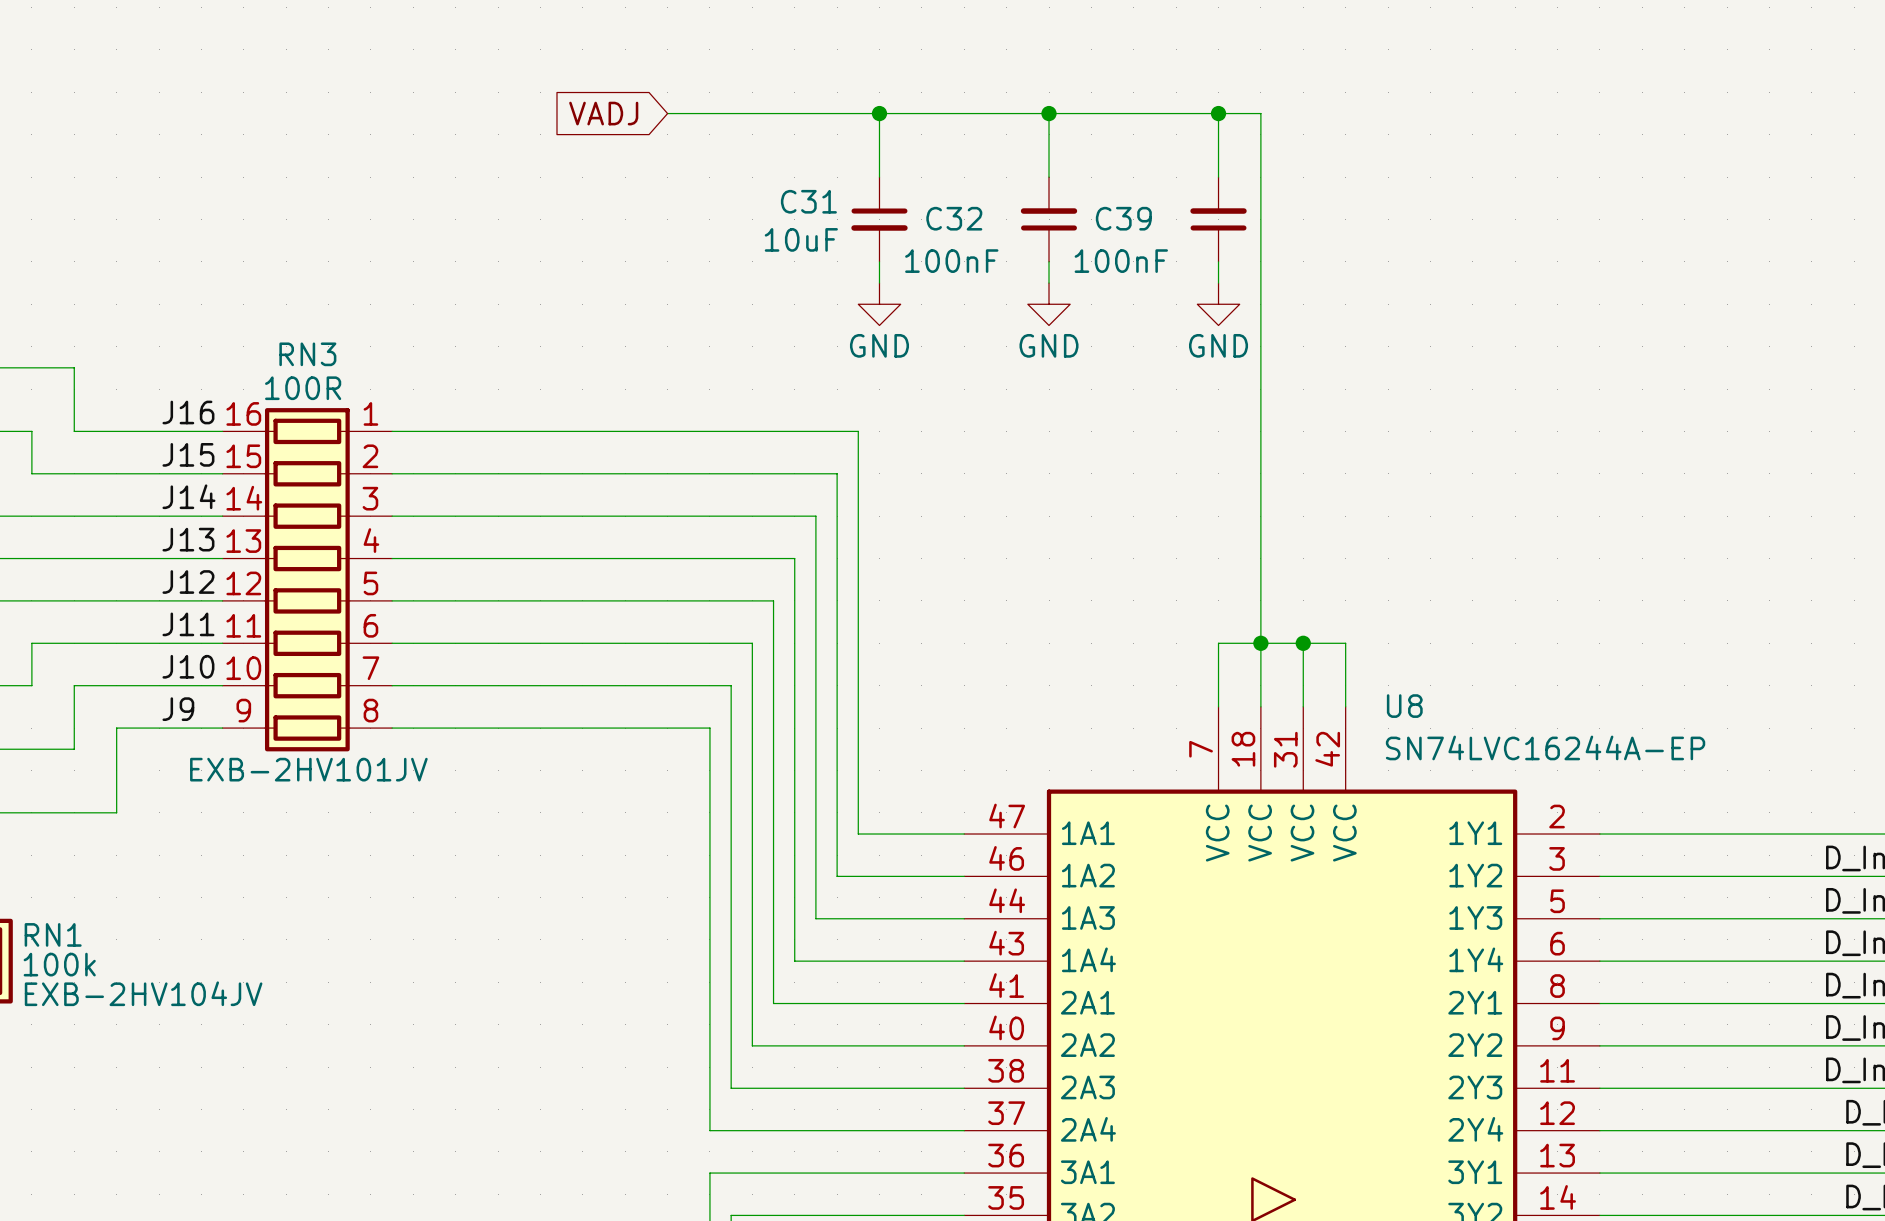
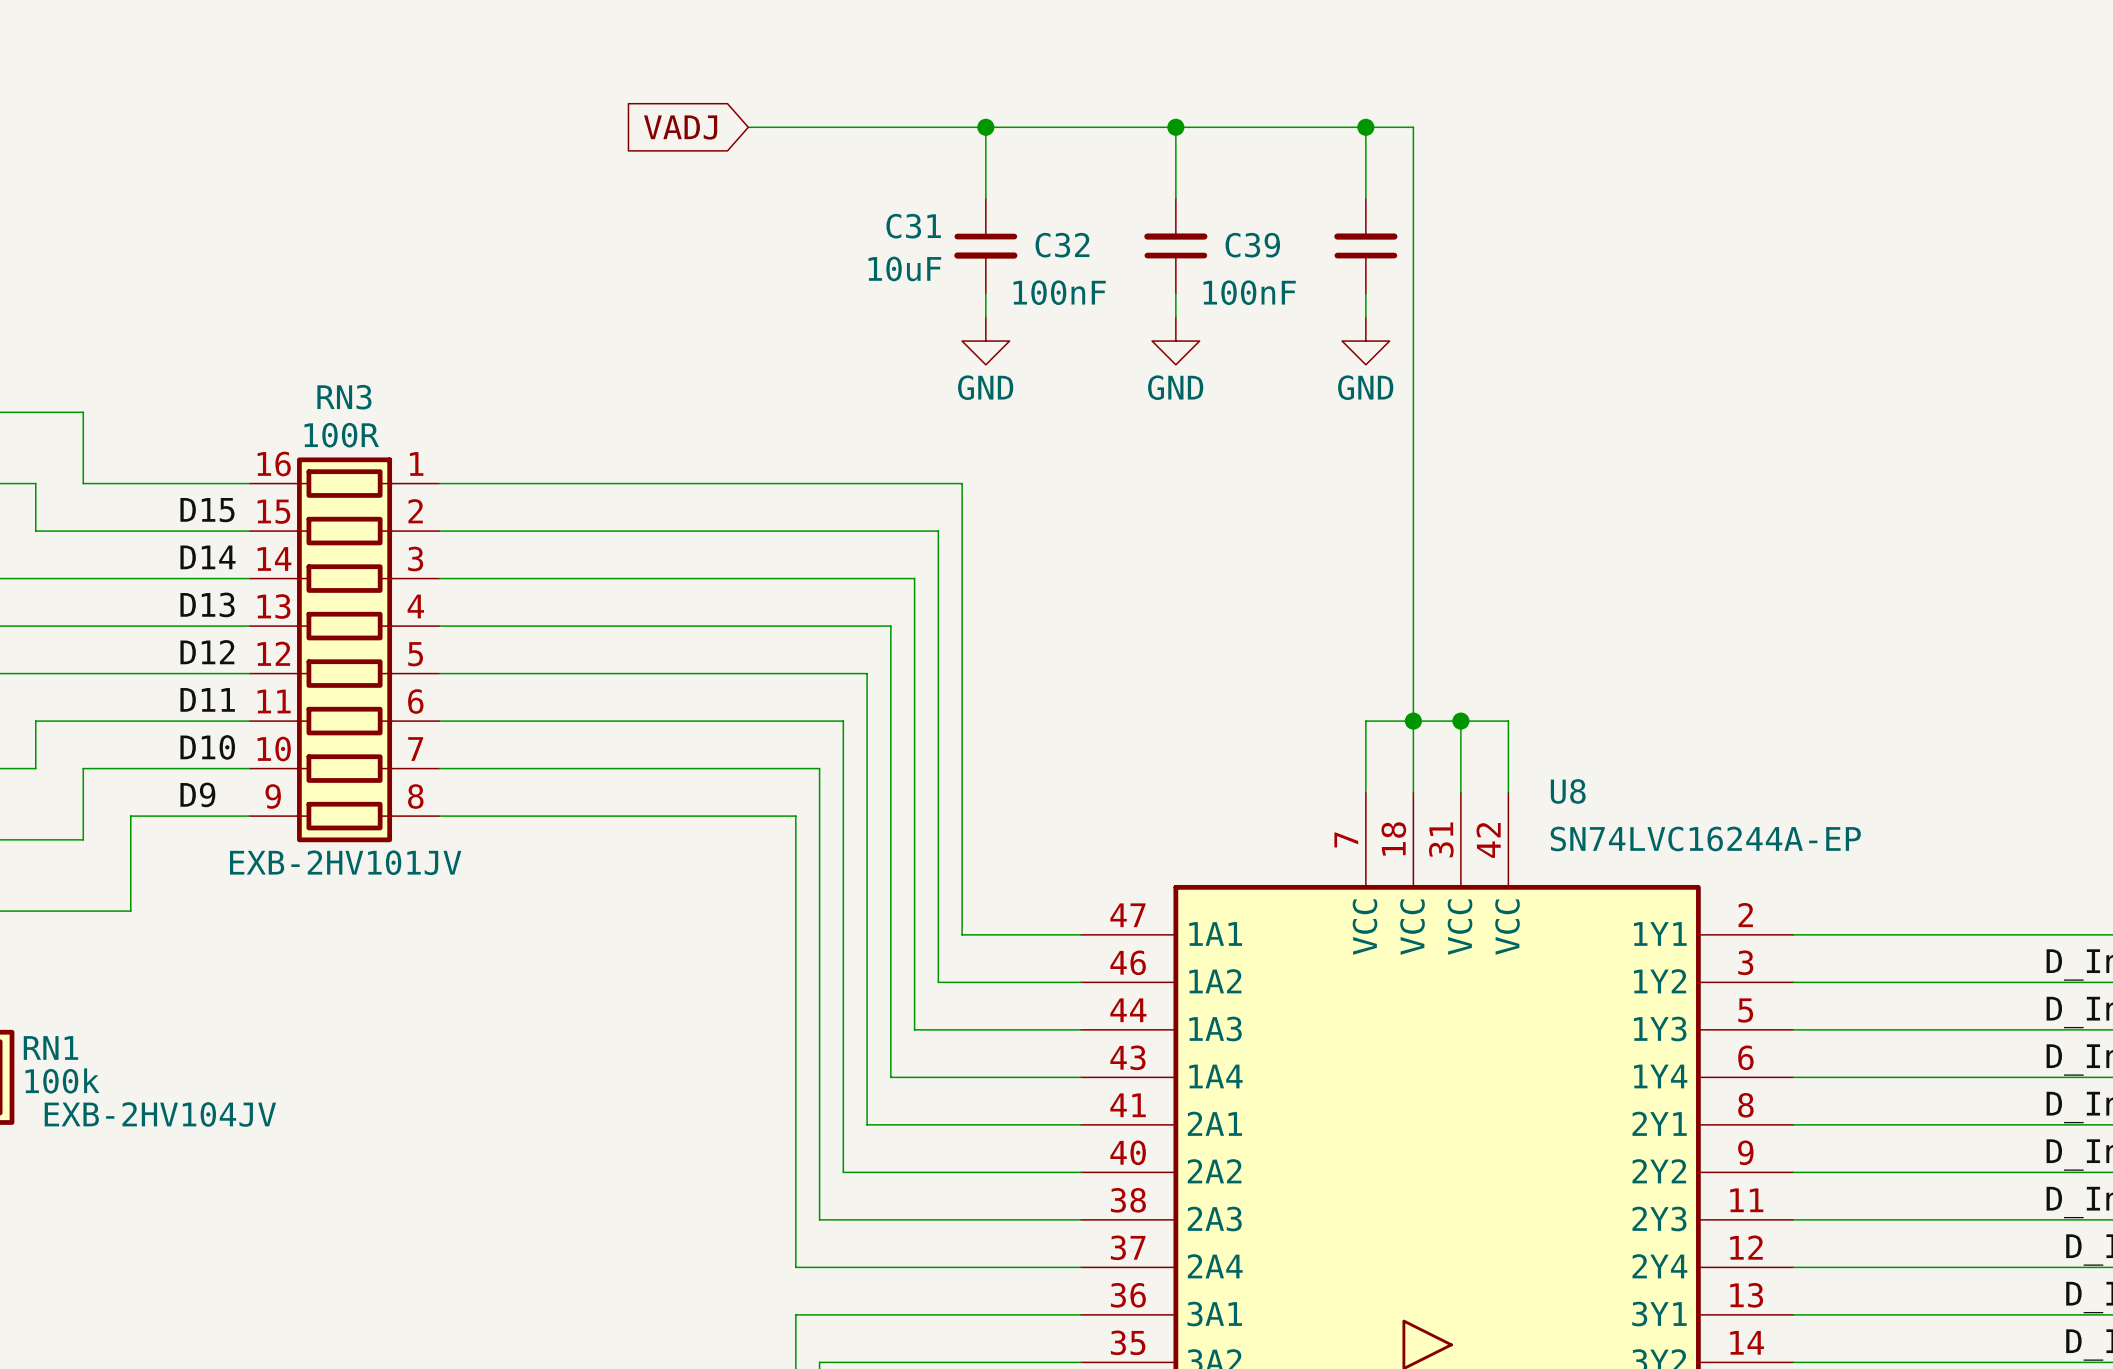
label: J16 (188, 412) -> none
label: J15 (188, 454) -> D15 (207, 510)
label: J14 (188, 496) -> D14 (208, 557)
label: J13 (188, 539) -> D13 (207, 604)
label: J12 (188, 582) -> D12 (207, 652)
label: J11 (188, 624) -> D11 (207, 699)
label: J10 (188, 666) -> D10 (207, 747)
label: J9 (178, 709) -> D9 (197, 794)

